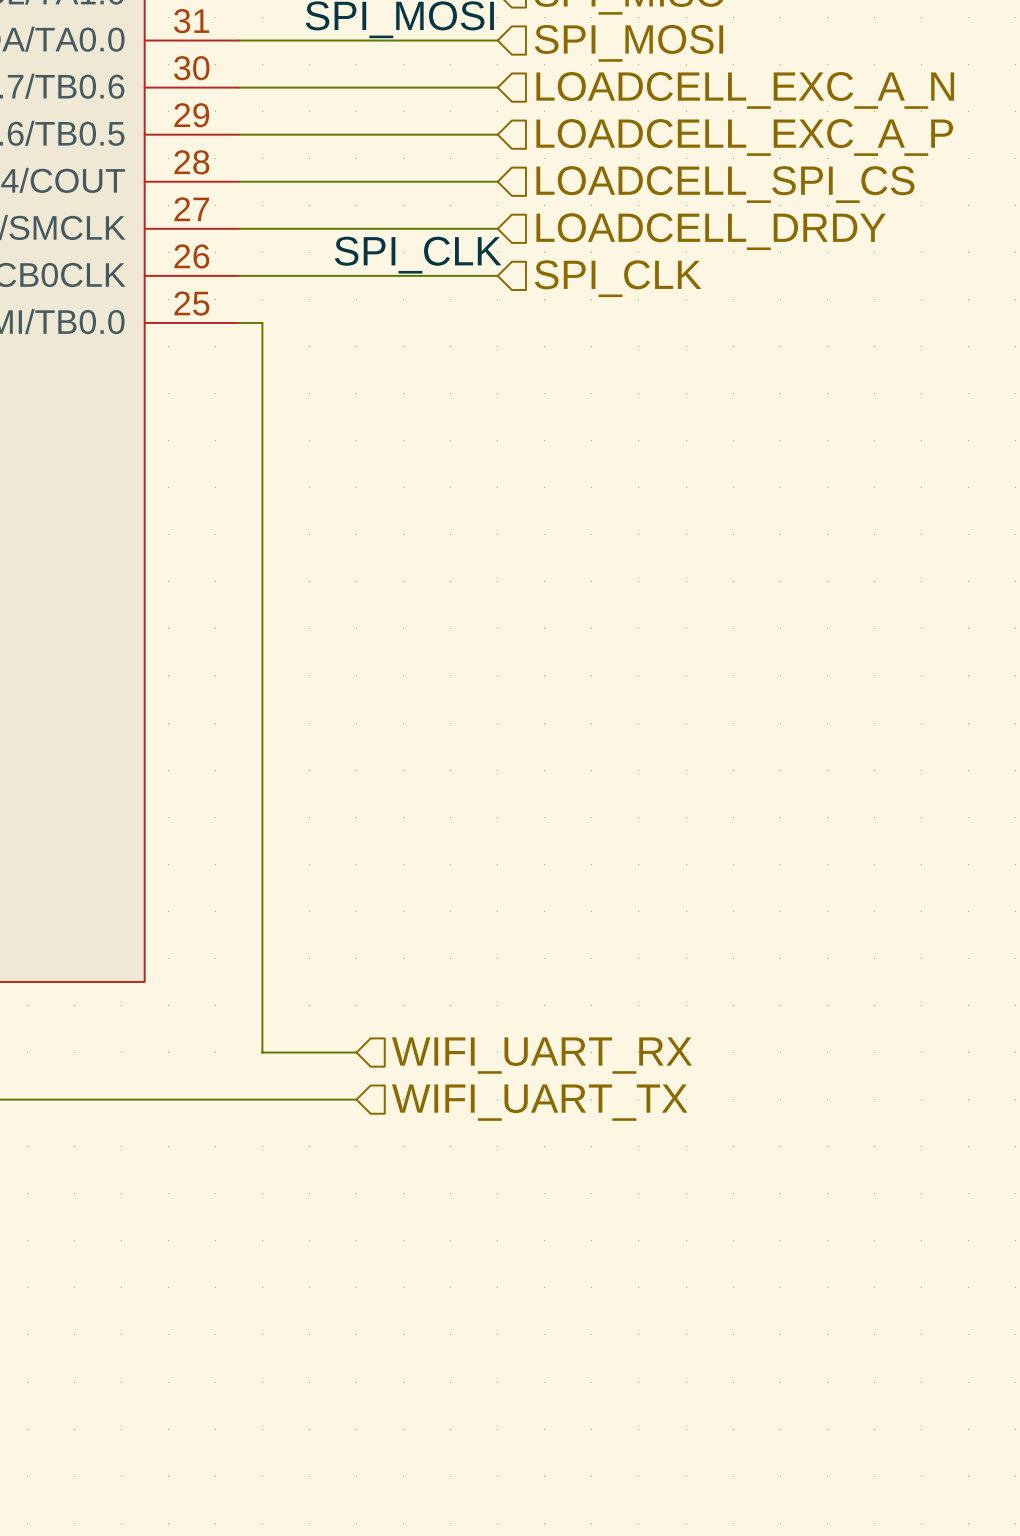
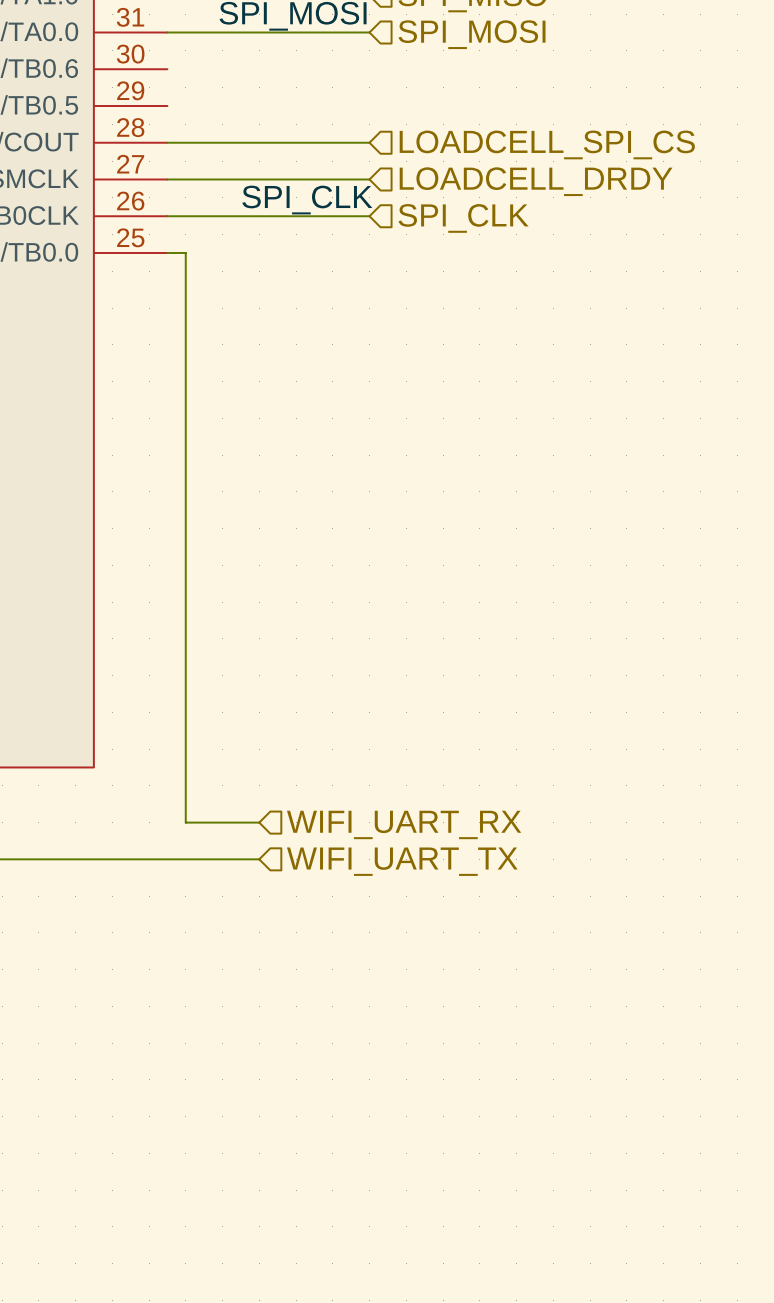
wire: (238, 87) (497, 87) -> none
hierarchical label: LOADCELL_EXC_A_N (745, 90) -> none
wire: (238, 134) (497, 134) -> none
hierarchical label: LOADCELL_EXC_A_P (744, 137) -> none

